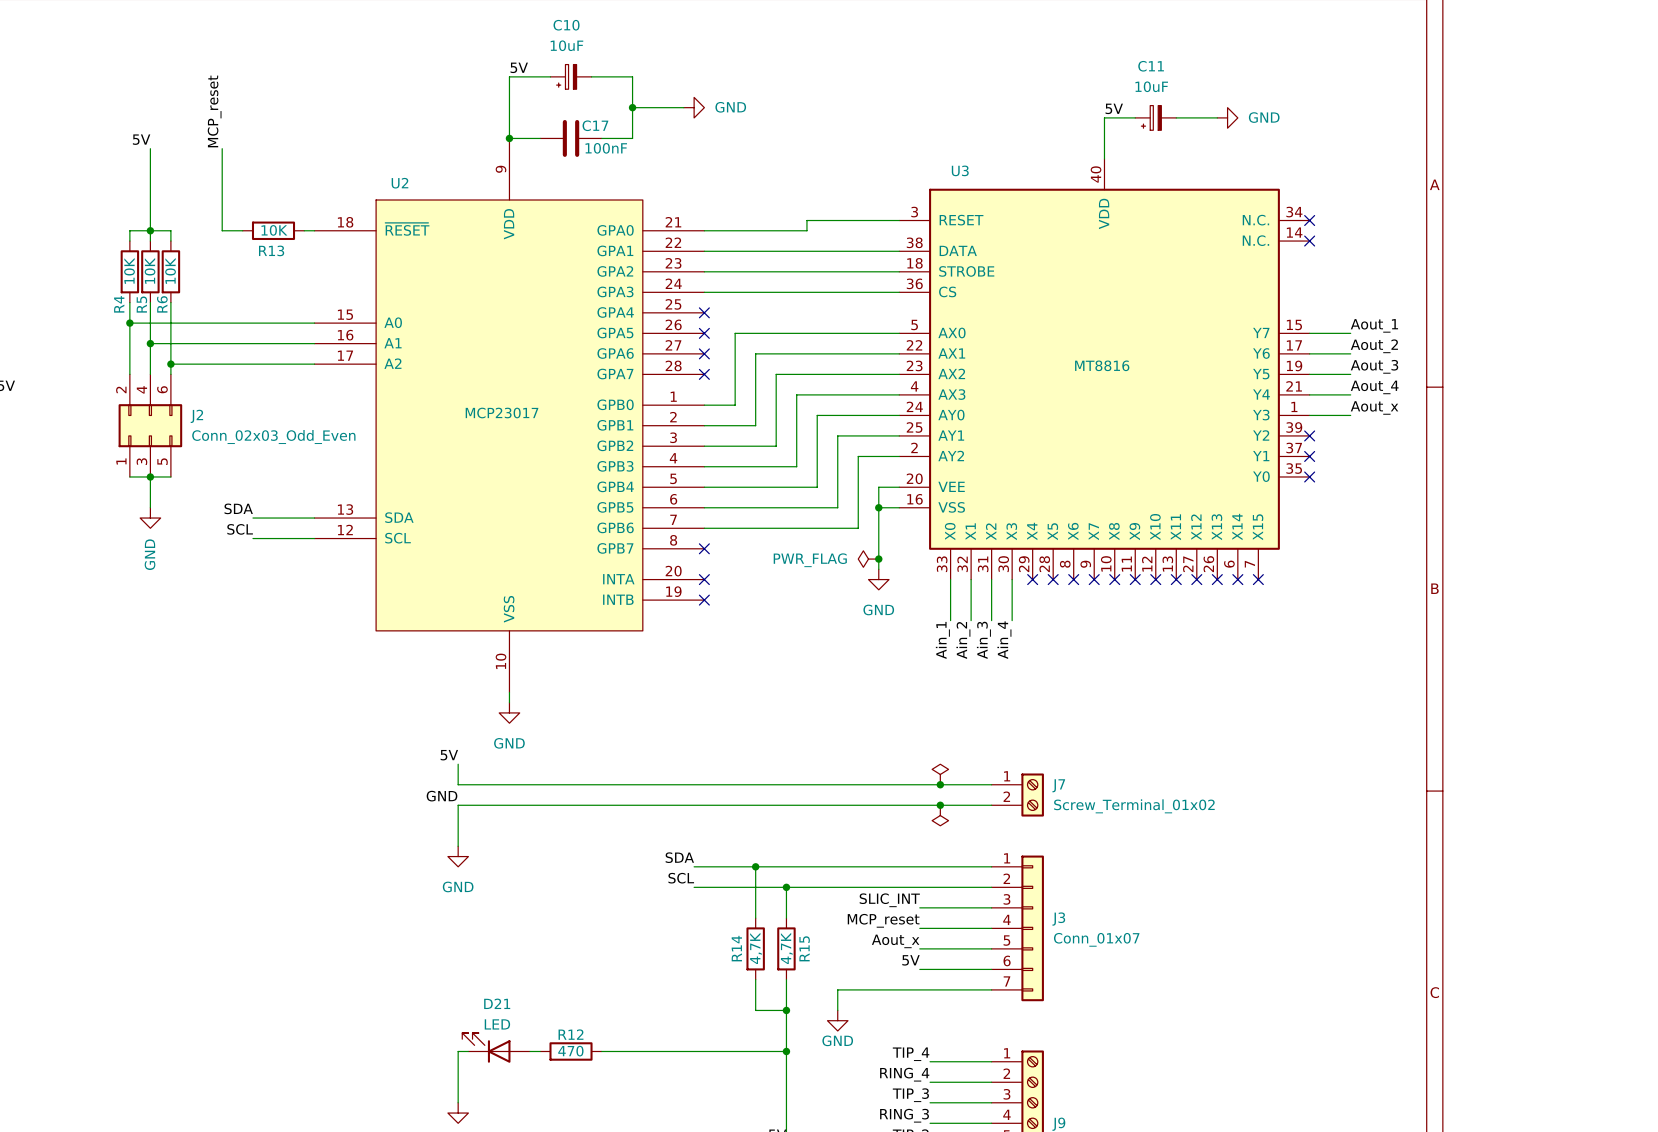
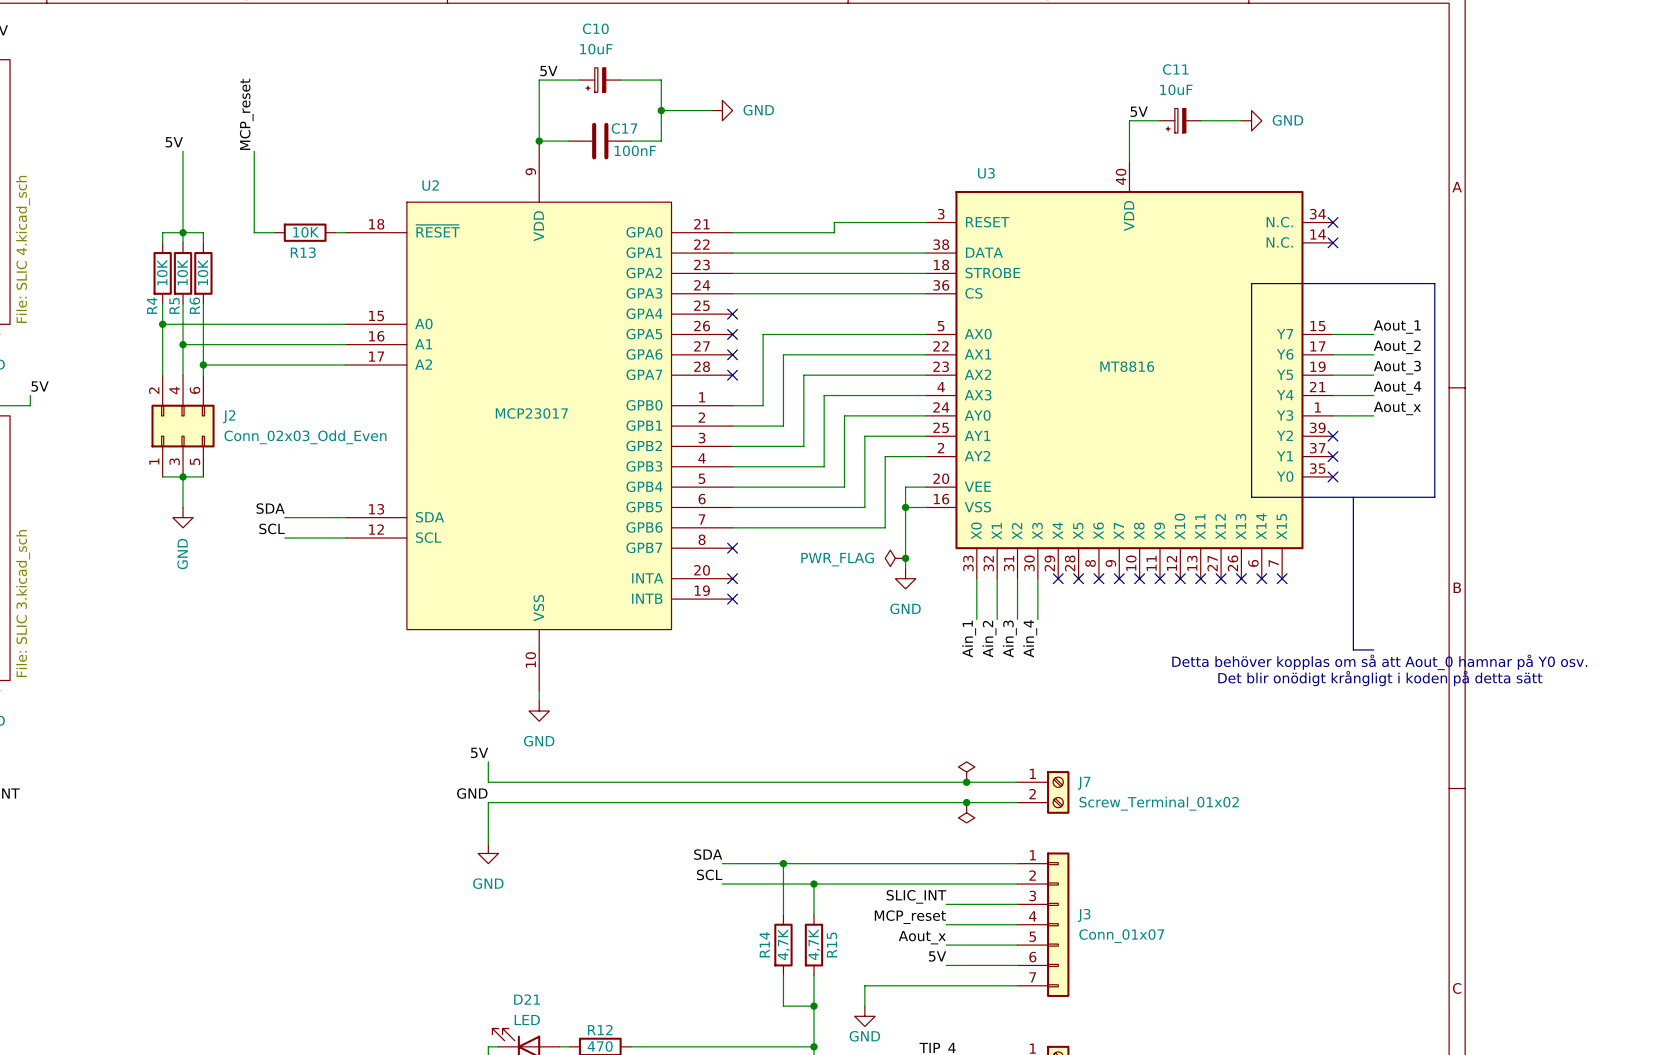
line: none -> (1251, 283) (1434, 283) (1434, 497) (1251, 497) (1251, 283)
line: none -> (1353, 497) (1353, 649) (1373, 649)
text: none -> Detta behöver kopplas om så att Aout_0 hamnar på Y0 osv. (1379, 662)
text: none -> Det blir onödigt krångligt i koden på detta sätt (1380, 678)

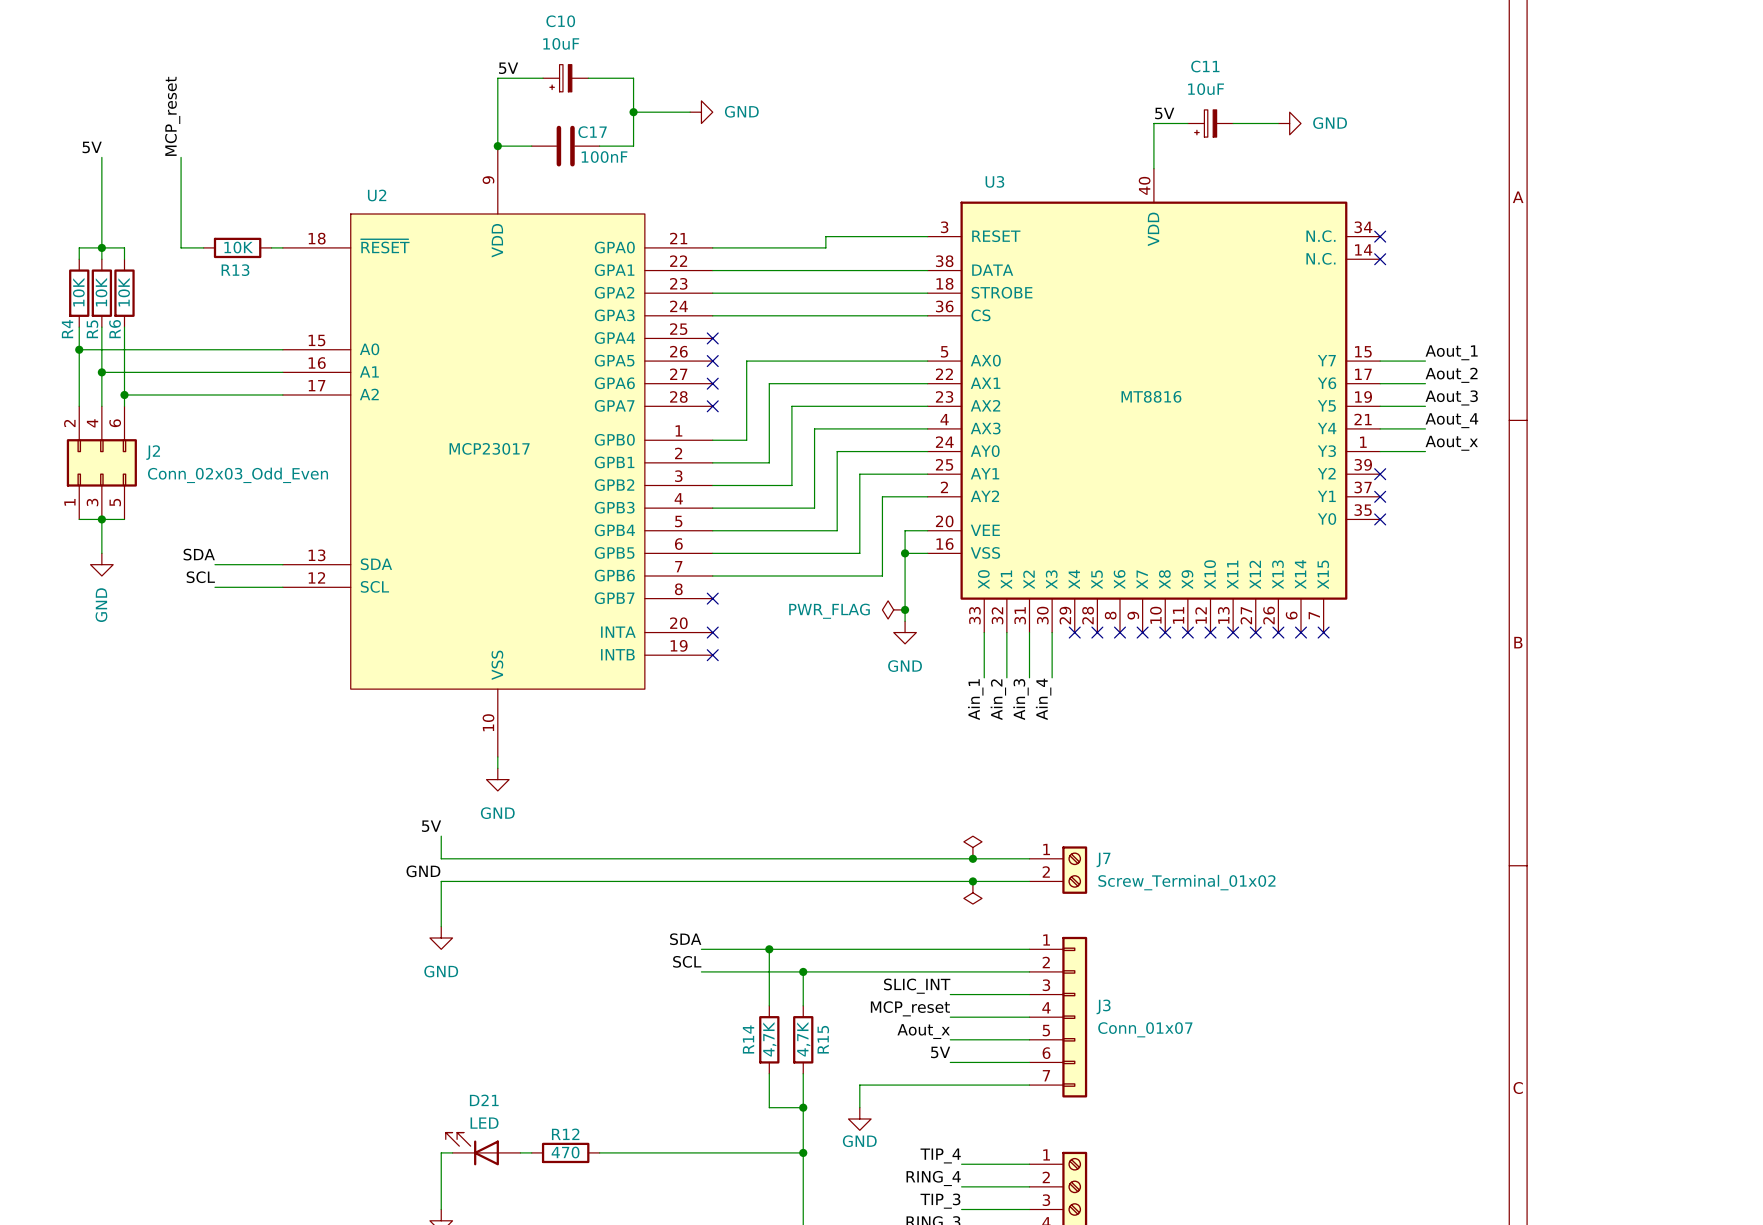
line: (1251, 283) (1434, 283) (1434, 497) (1251, 497) (1251, 283) -> none
line: (1353, 497) (1353, 649) (1373, 649) -> none
text: Detta behöver kopplas om så att Aout_0 hamnar på Y0 osv. (1379, 662) -> none
text: Det blir onödigt krångligt i koden på detta sätt (1380, 678) -> none

